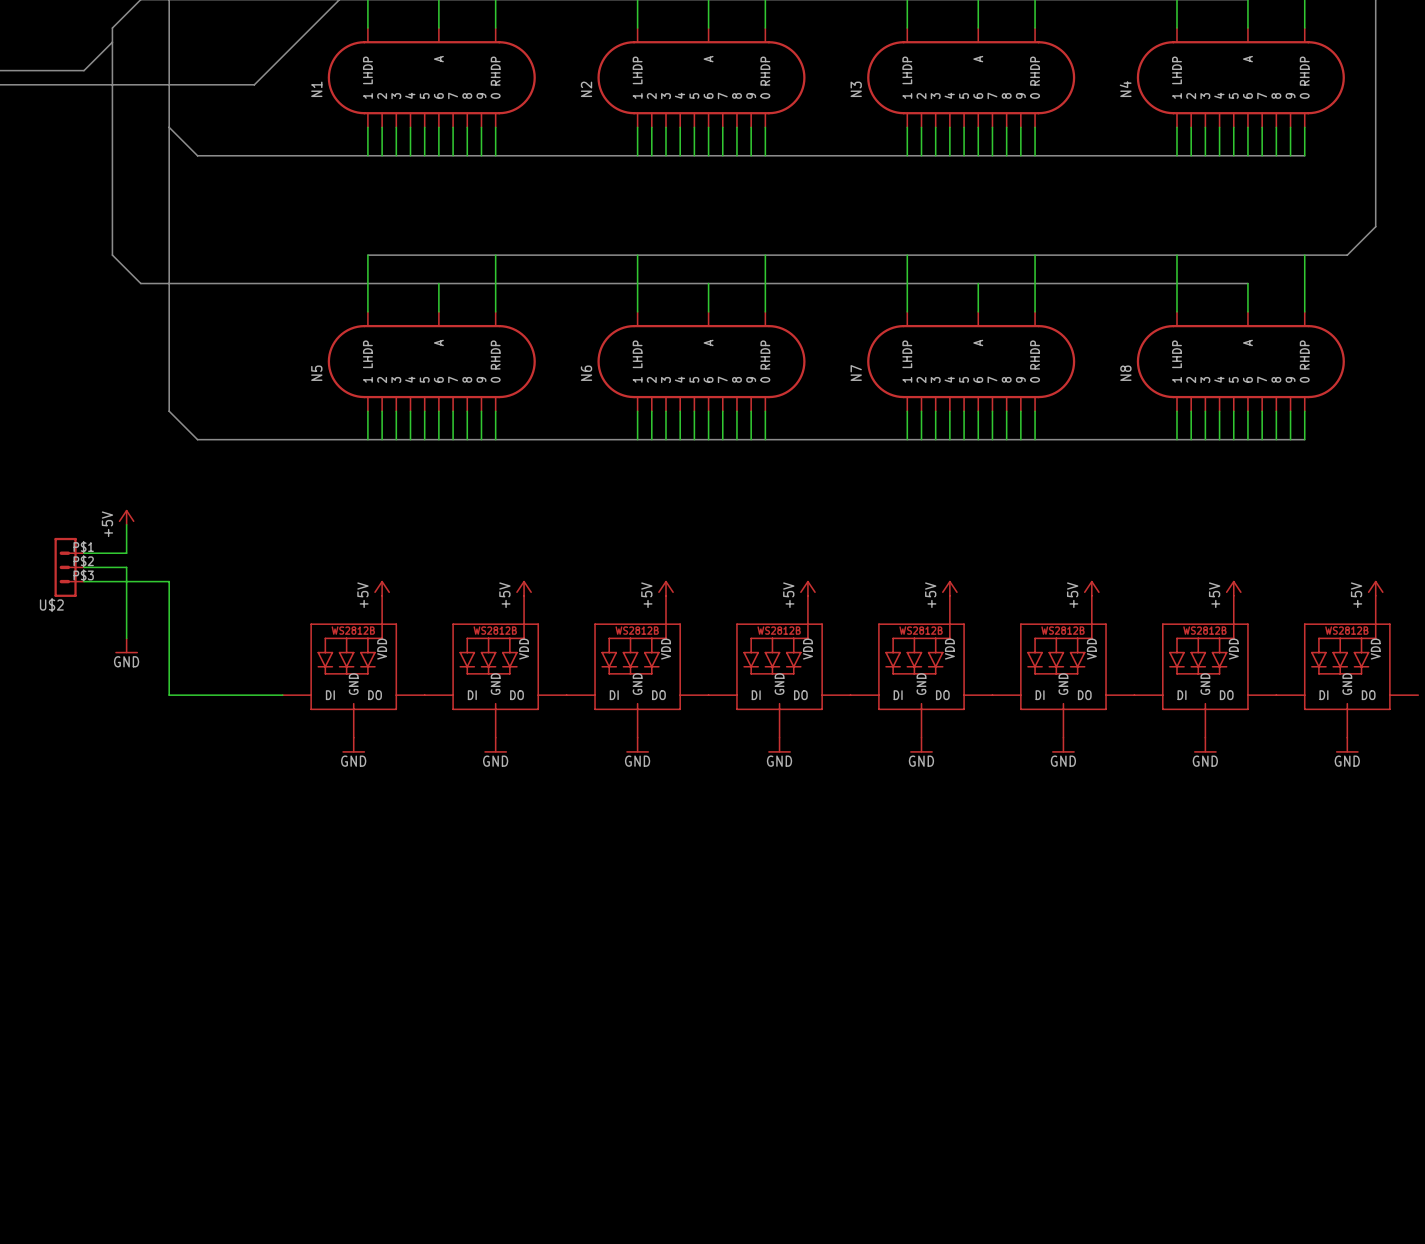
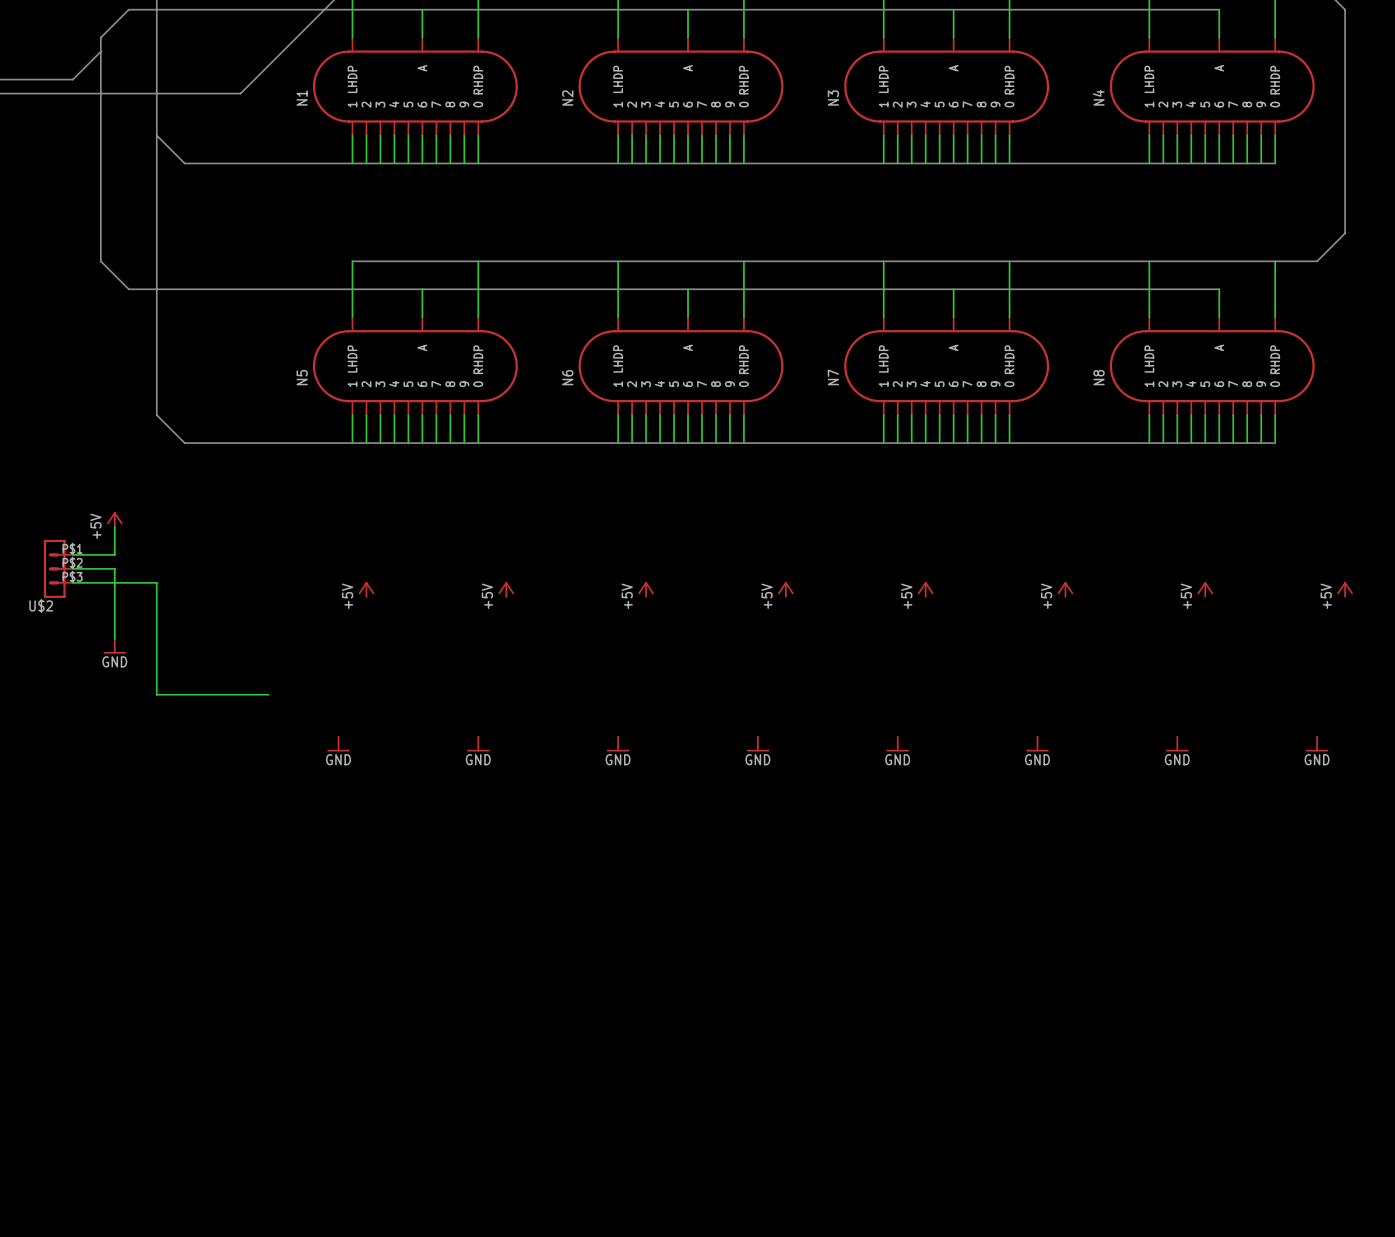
part: (353, 666) -> none
part: (495, 666) -> none
part: (637, 666) -> none
part: (779, 666) -> none
part: (921, 666) -> none
part: (1063, 666) -> none
part: (1205, 666) -> none
part: (1347, 666) -> none

